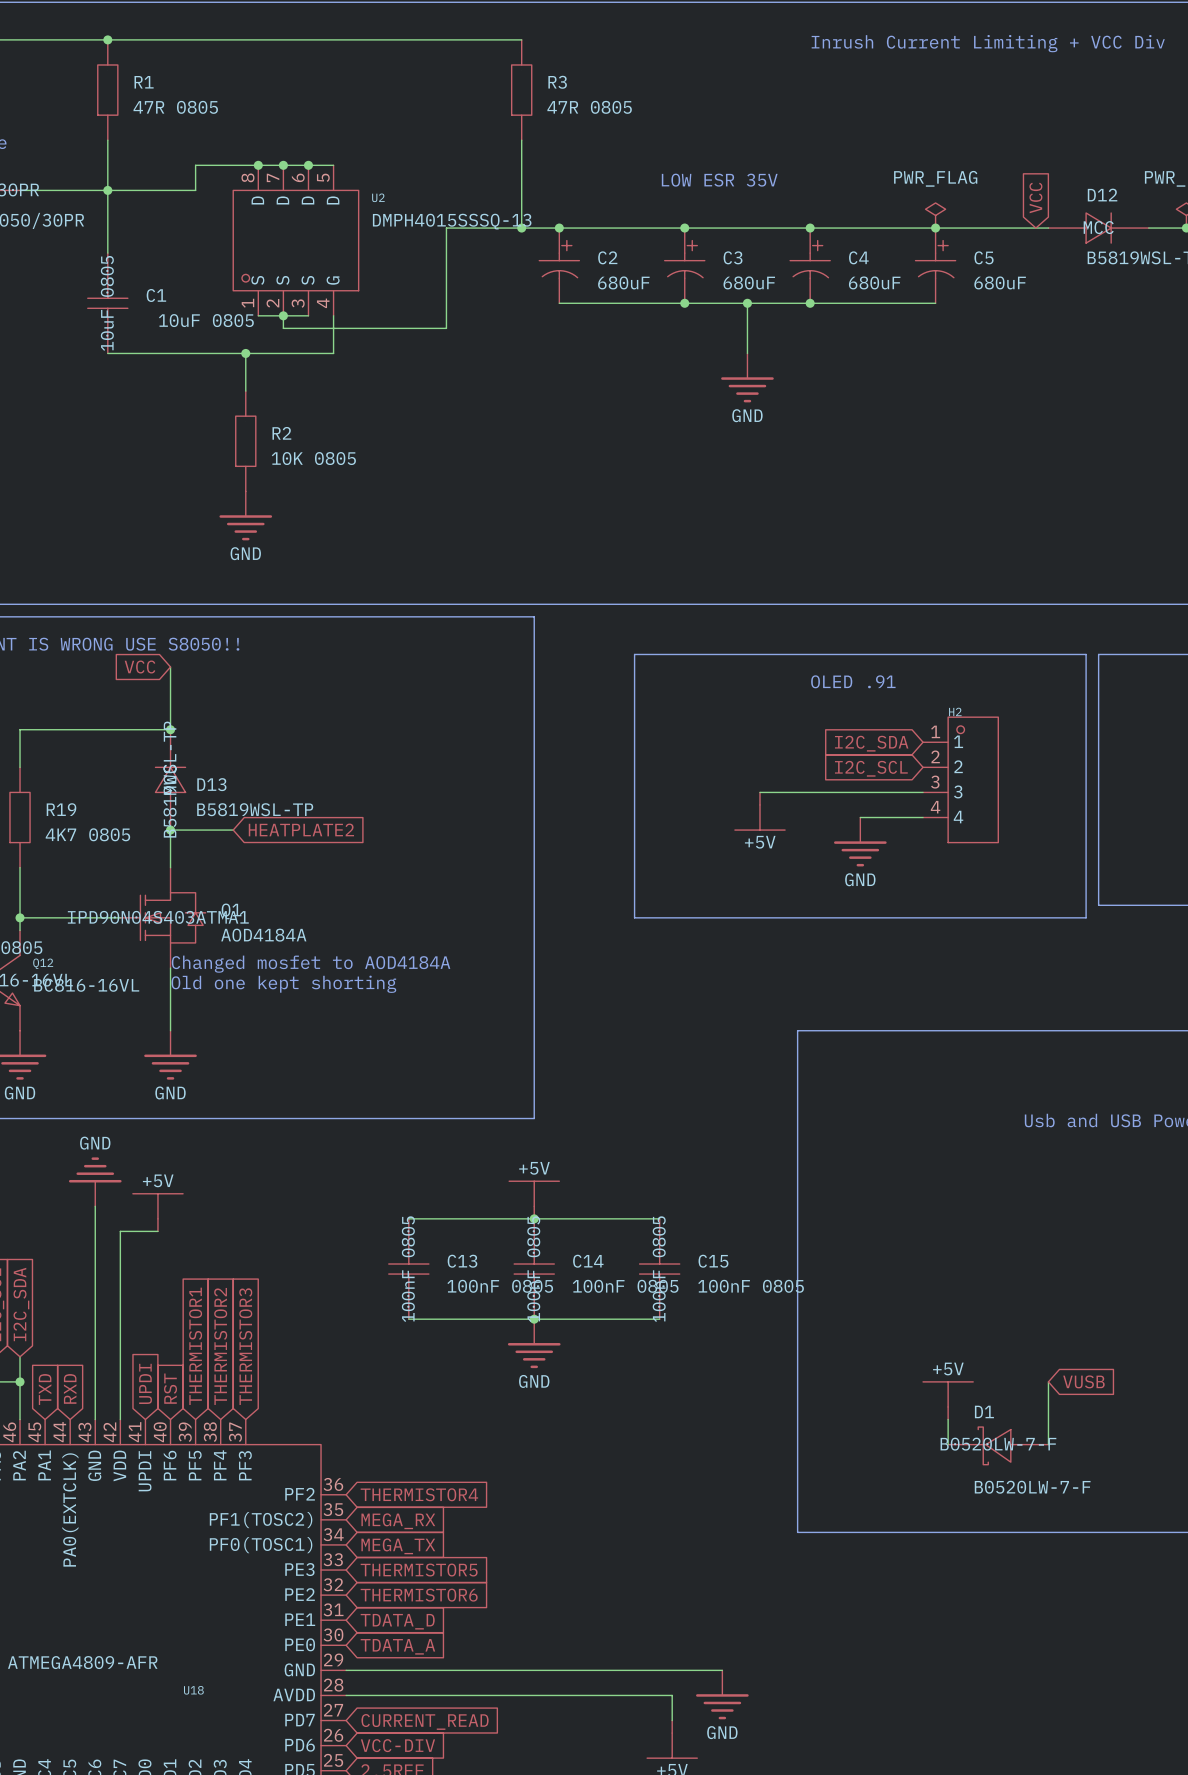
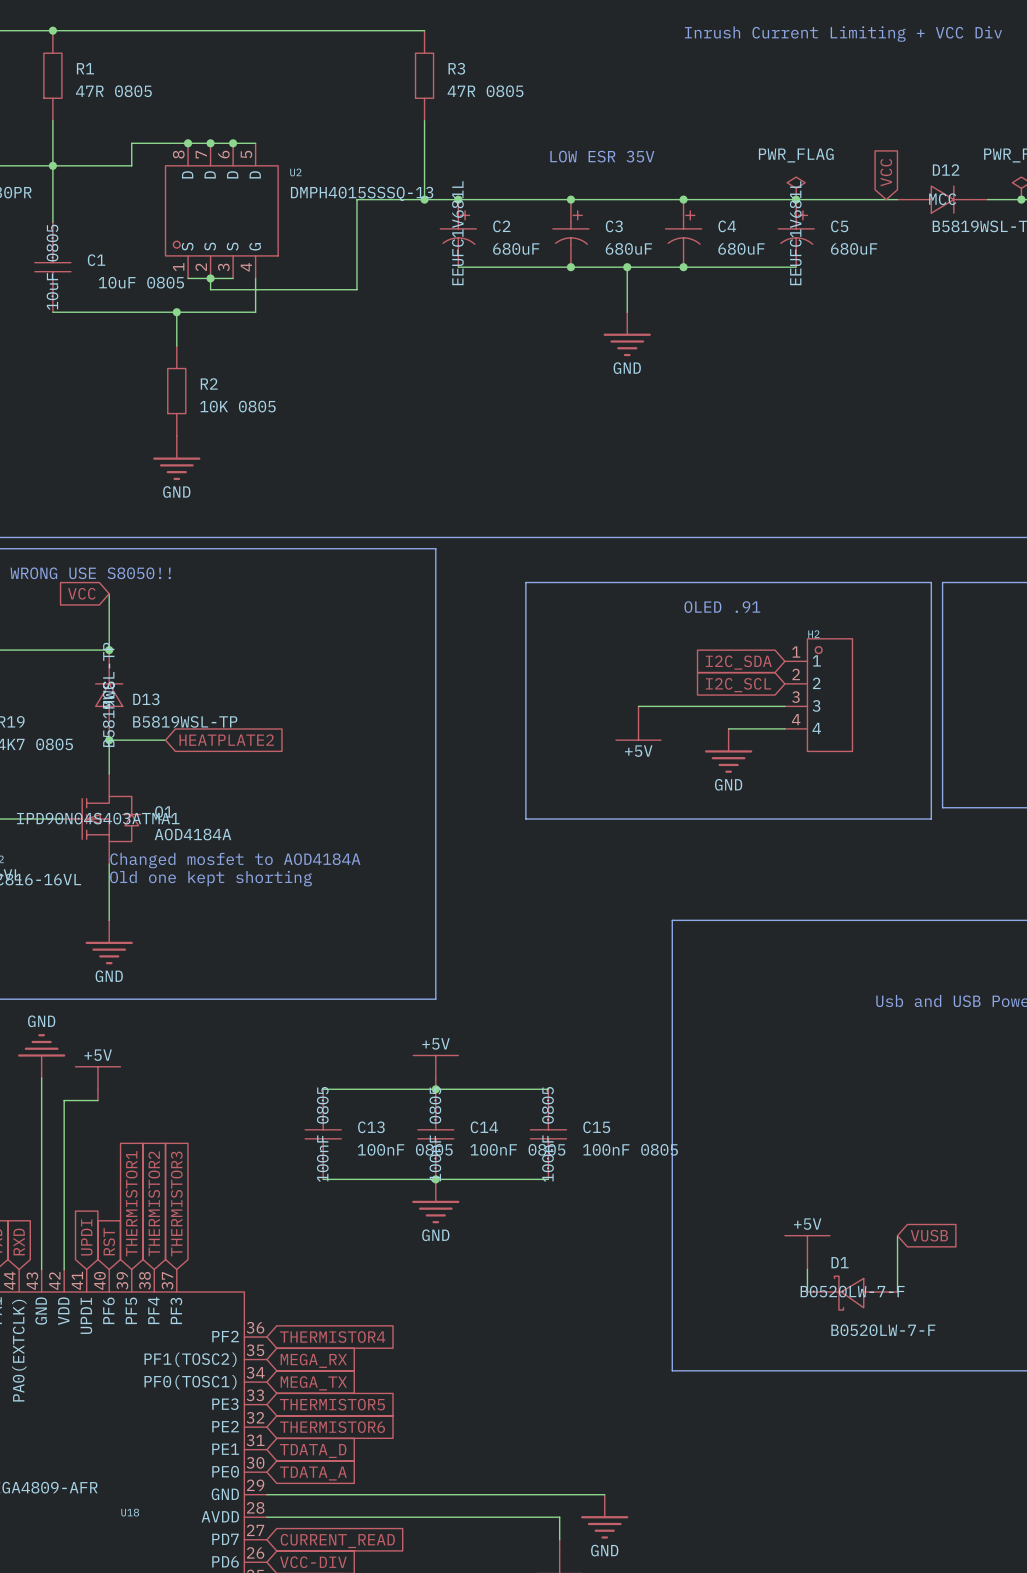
C2 text: none -> EEUFC1V681L (457, 233)
C5 text: none -> EEUFC1V681L (795, 233)

